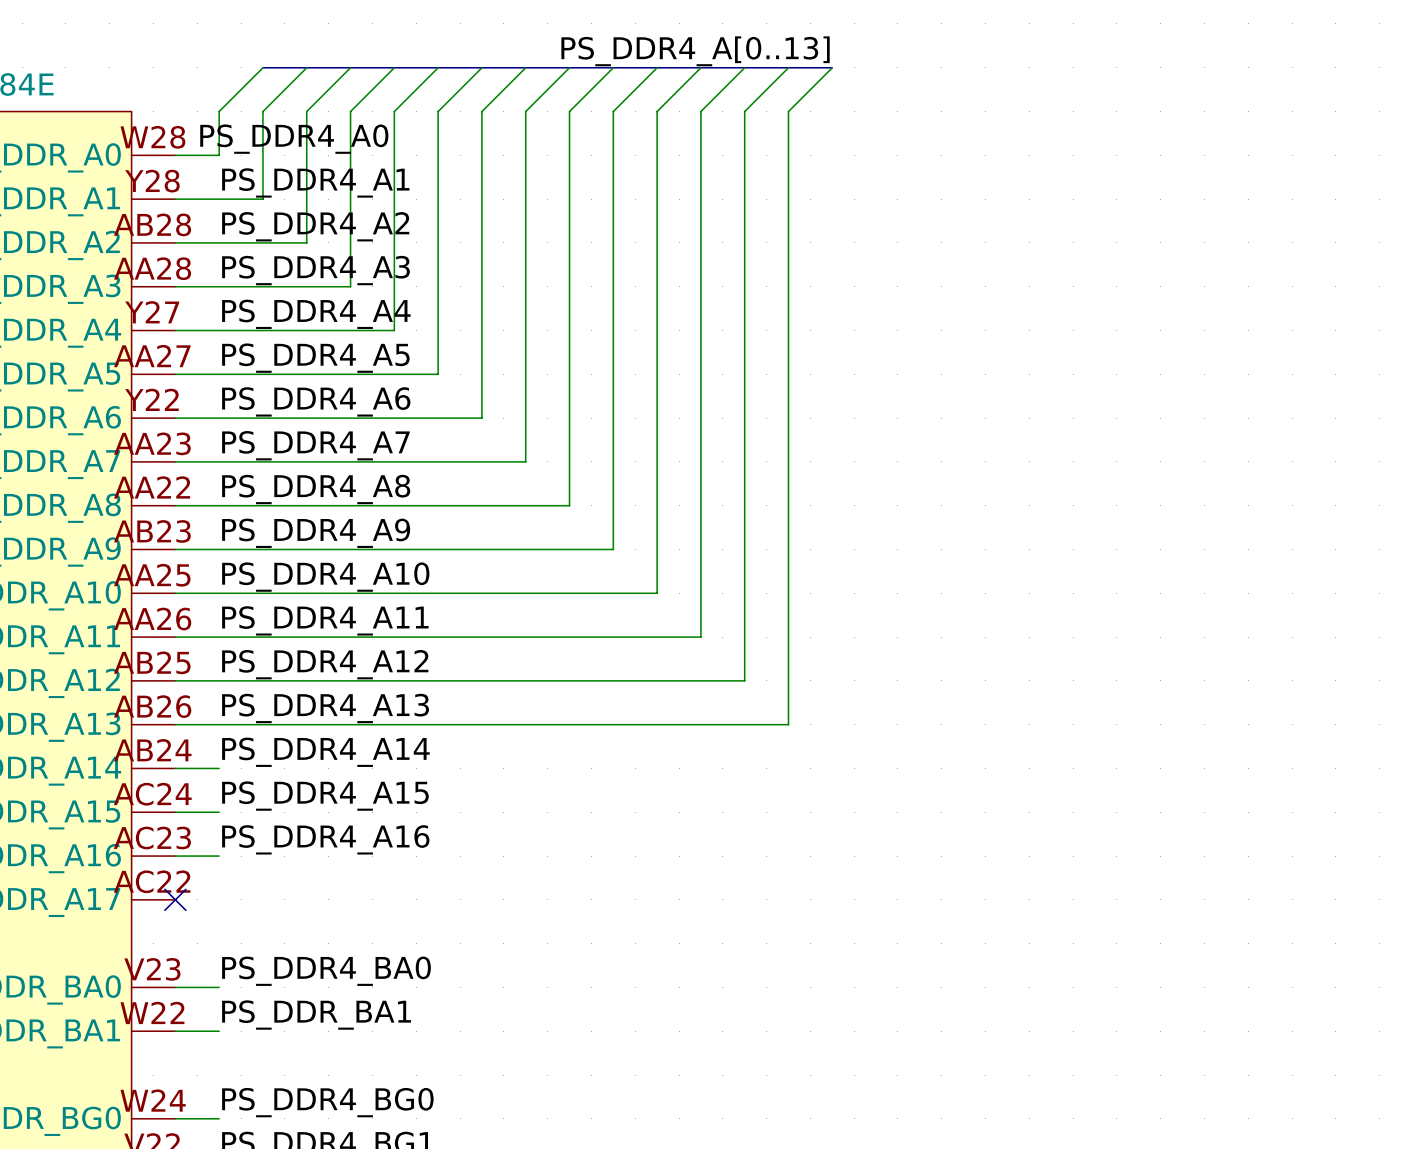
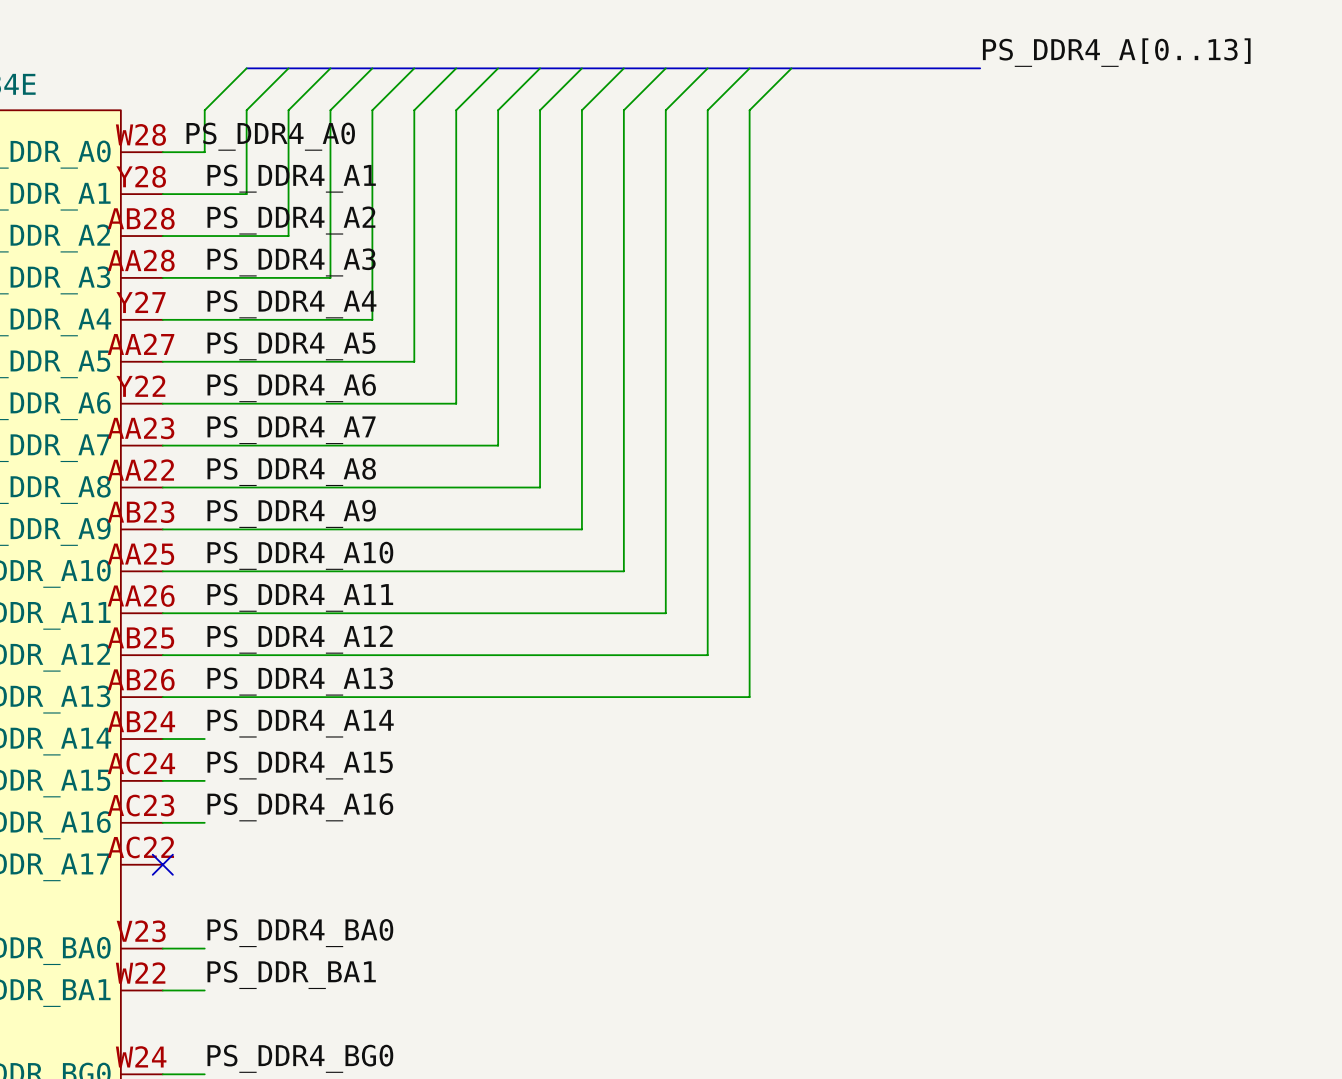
label position: PS_DDR4_A[0..13] (695, 51) -> PS_DDR4_A[0..13] (1116, 52)
bus: none -> (791, 68) (980, 68)

